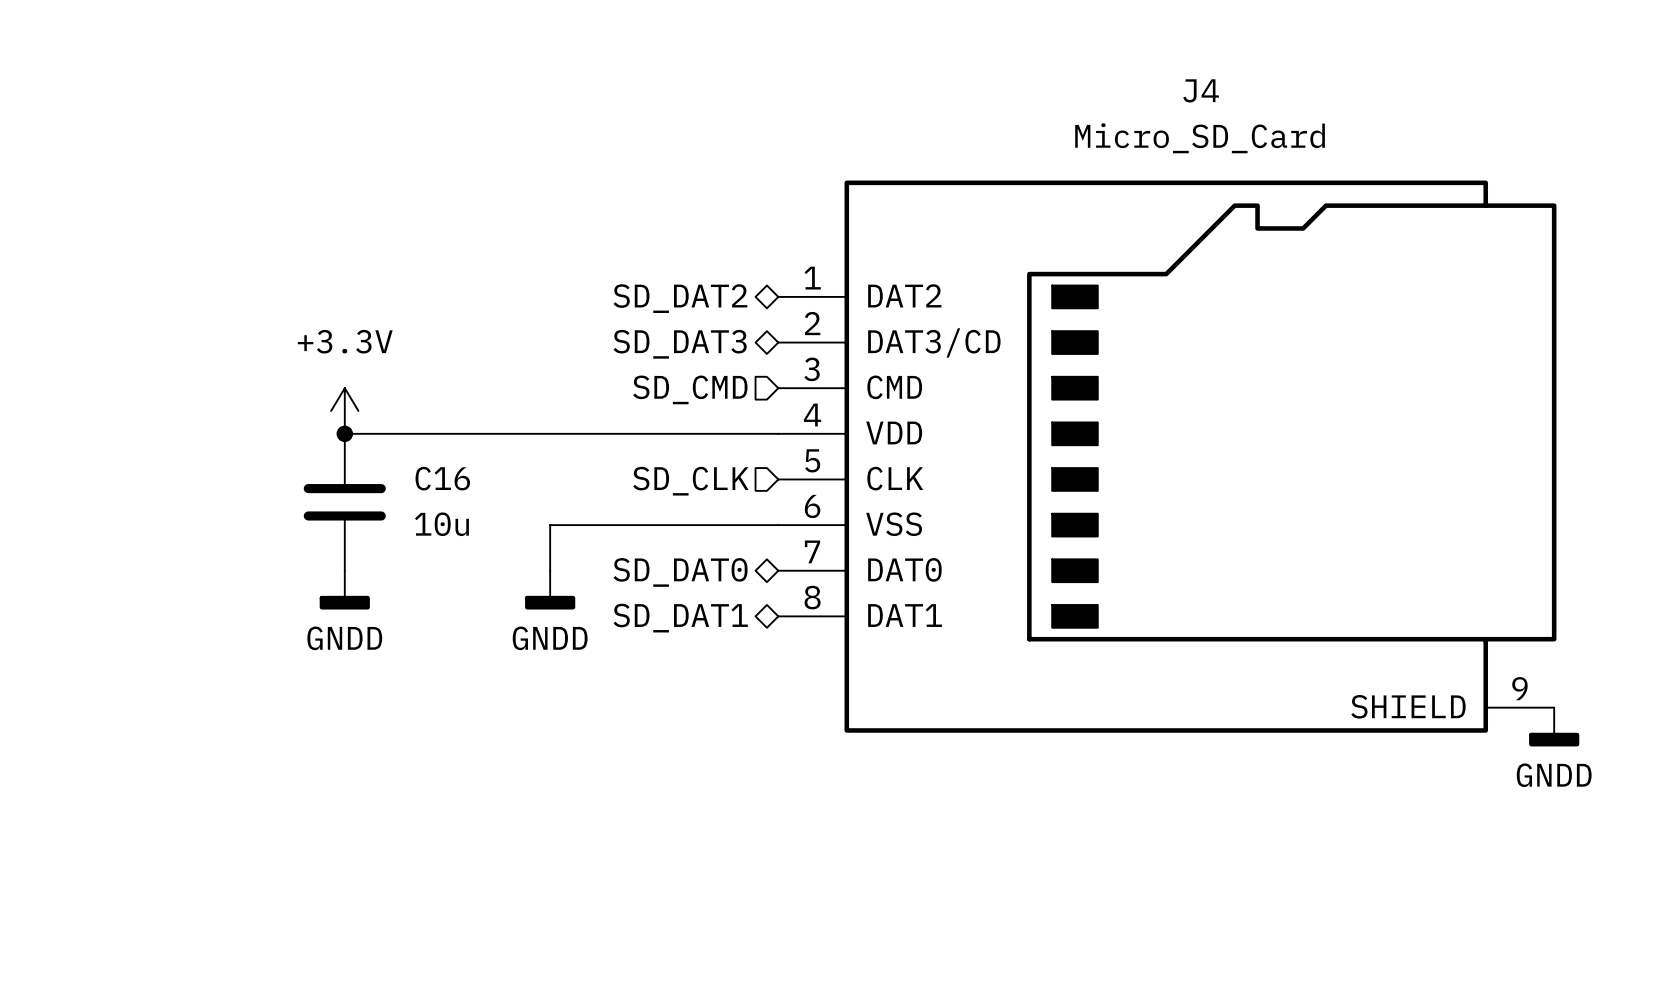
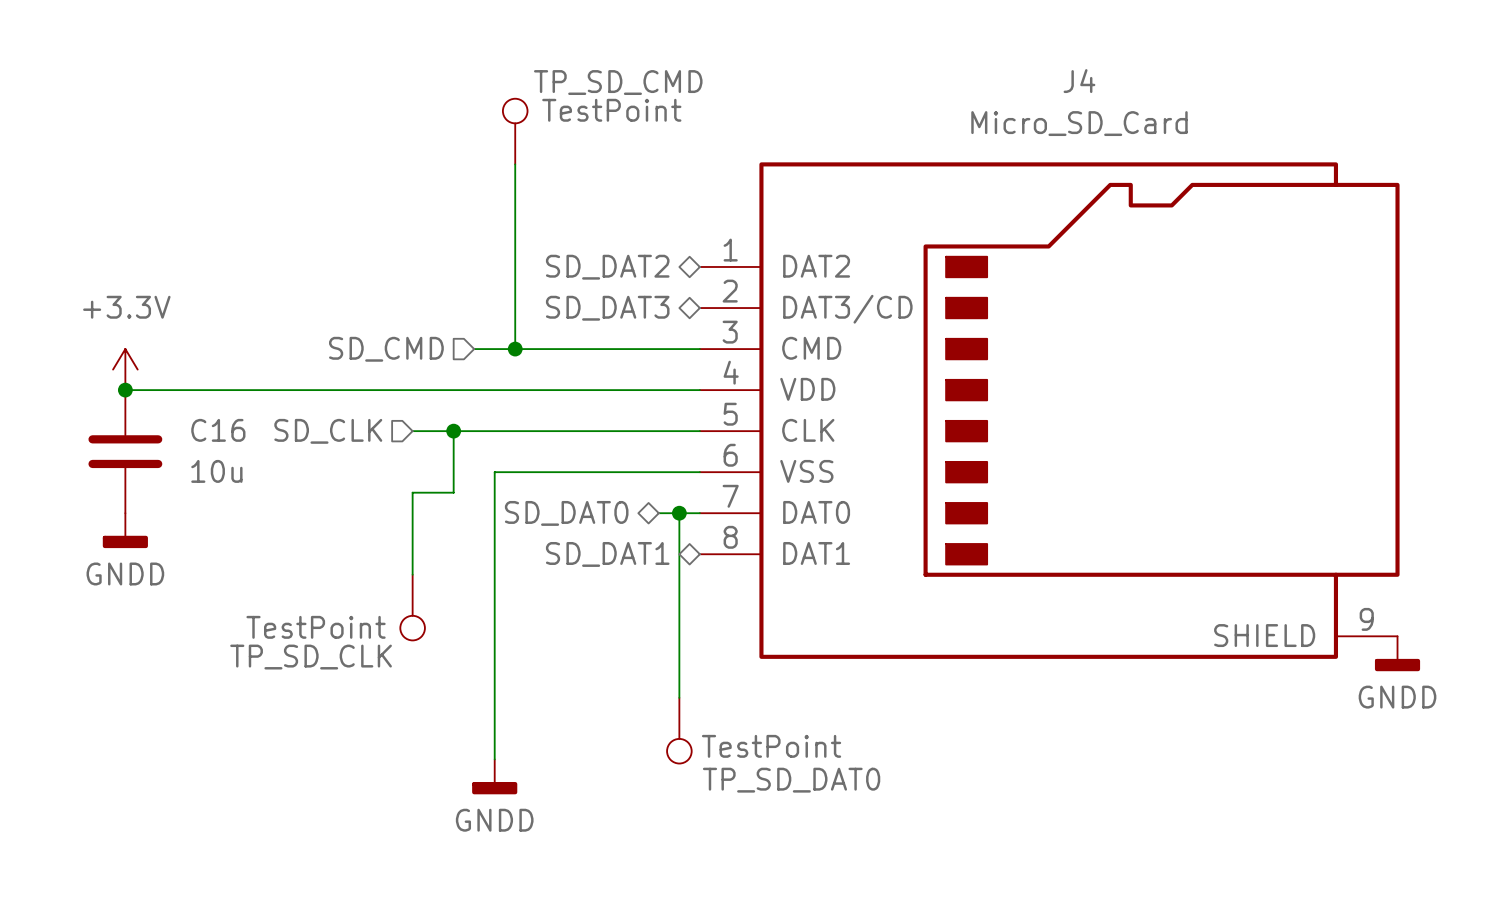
TP_SD_CMD: none -> TestPoint (515, 131)
wire: none -> (515, 164) (515, 349)
wire: none -> (474, 349) (699, 349)
junction: none -> (515, 349)
hierarchical label position: SD_CMD (690, 389) -> SD_CMD (386, 349)
power symbol position: +3.3V (344, 411) -> +3.3V (125, 369)
wire: none -> (125, 390) (310, 390)
junction: none -> (125, 390)
junction: (344, 433) -> none
wire: none -> (412, 431) (699, 431)
wire: none -> (453, 431) (453, 492) (412, 492) (412, 574)
junction: none -> (453, 431)
hierarchical label position: SD_CLK (690, 481) -> SD_CLK (328, 431)
C16 position: (344, 502) -> (125, 451)
wire: none -> (494, 513) (494, 759)
wire: none -> (658, 513) (699, 513)
wire: none -> (679, 513) (679, 697)
junction: none -> (679, 513)
hierarchical label position: SD_DAT0 (680, 572) -> SD_DAT0 (566, 513)
power symbol: none -> GNDD (125, 530)
power symbol: GNDD (344, 590) -> none
power symbol: GNDD (550, 590) -> none
TP_SD_CLK: none -> TestPoint (412, 607)
TP_SD_DAT0: none -> TestPoint (679, 730)
power symbol: none -> GNDD (494, 776)

